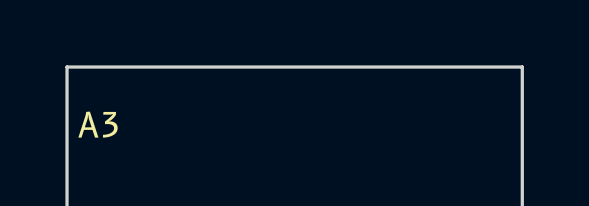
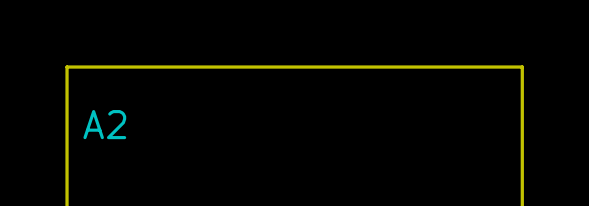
text: A3 (98, 124) -> A2 (104, 124)

